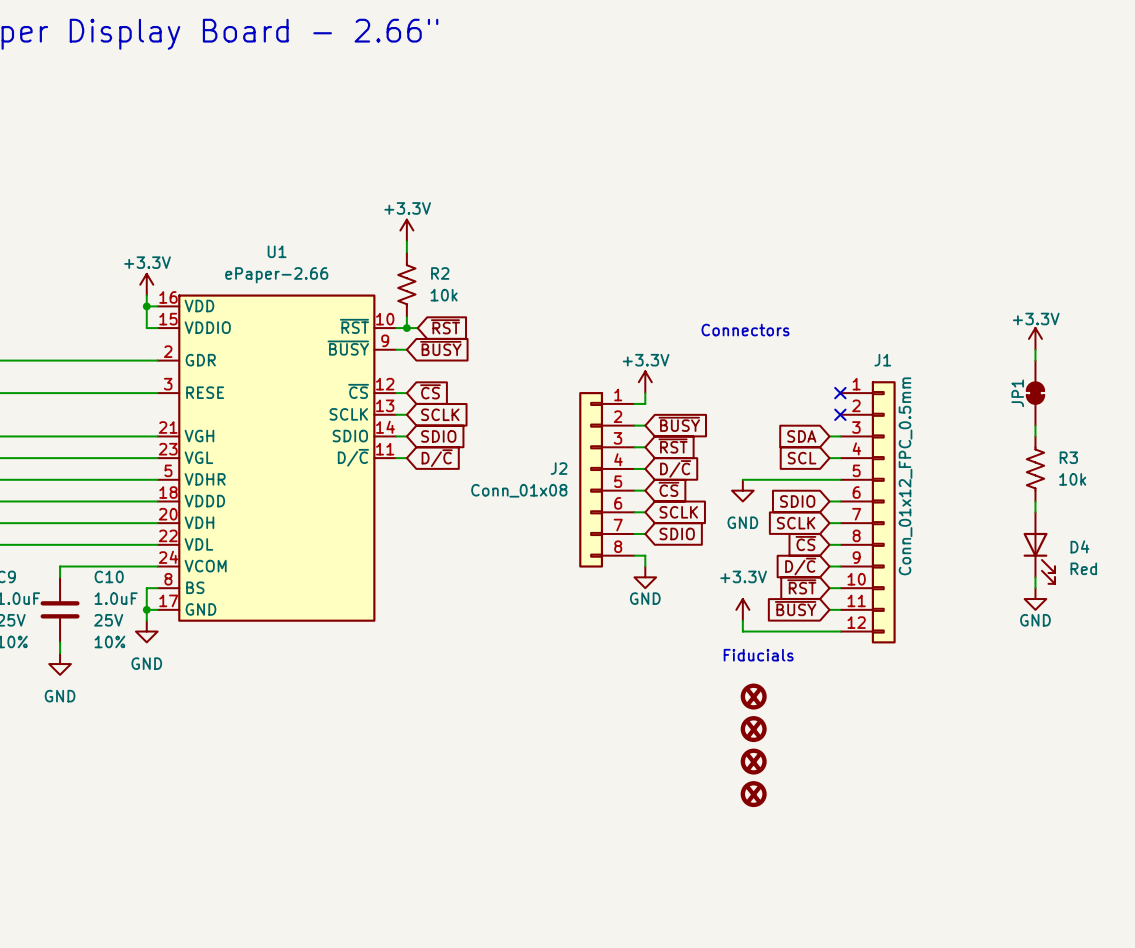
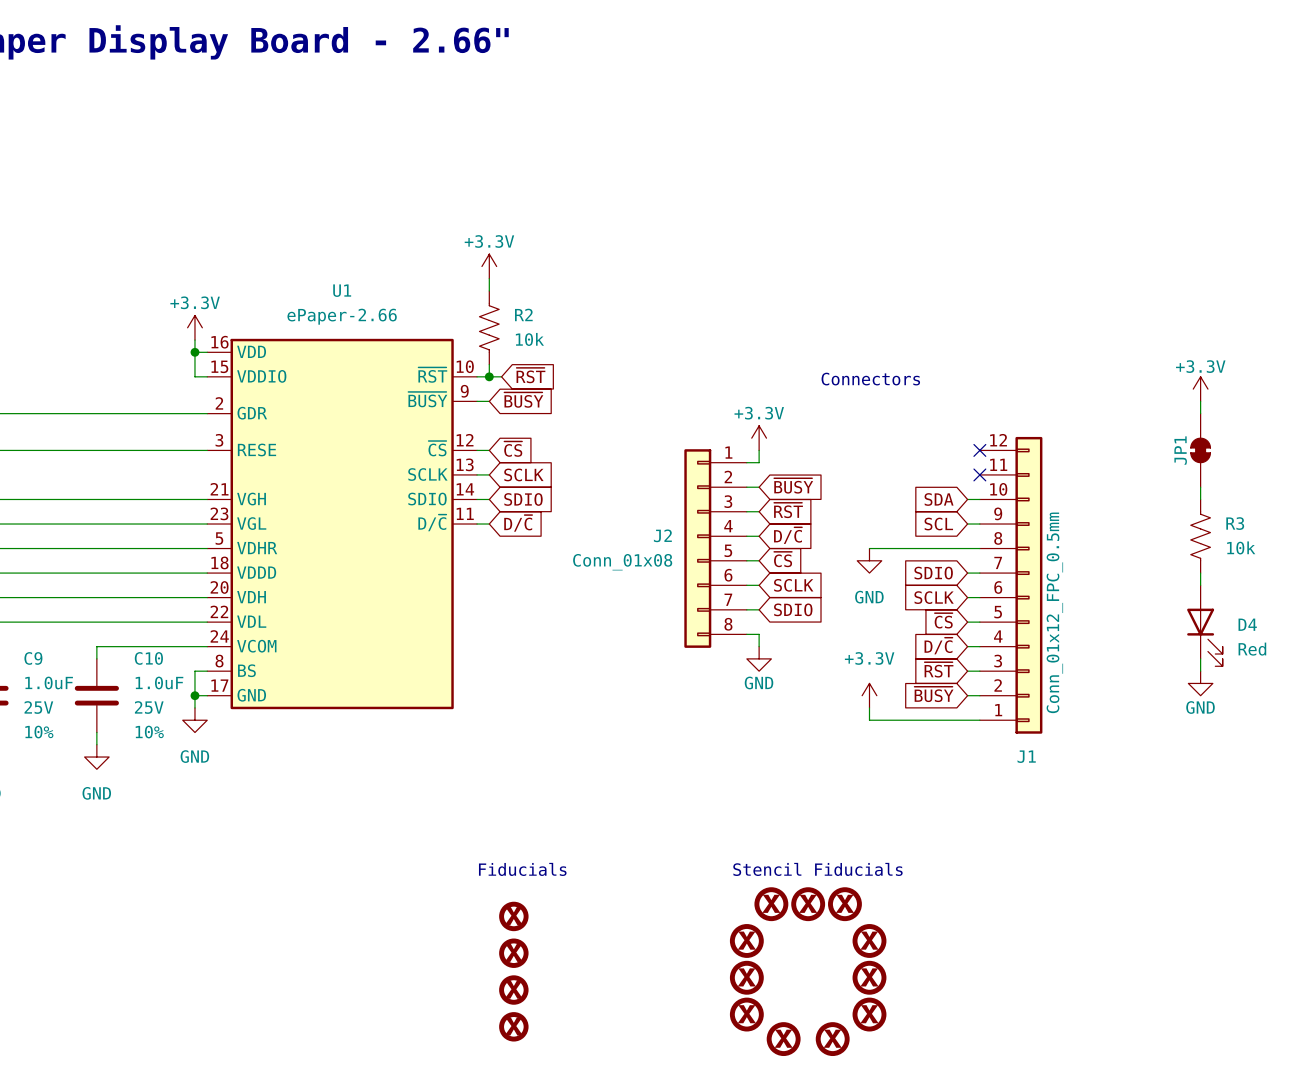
J1 flip: as is (883, 512) -> up-down (1028, 585)
text: Fiducials (758, 655) -> none
part: (753, 696) -> none
part: (753, 729) -> none
part: (753, 761) -> none
text: none -> Fiducials (522, 869)
text: none -> Stencil Fiducials (817, 869)
part: none -> (771, 904)
part: none -> (808, 904)
part: none -> (844, 904)
part: (753, 794) -> none
part: none -> (513, 916)
part: none -> (746, 940)
part: none -> (869, 940)
part: none -> (513, 953)
part: none -> (746, 977)
part: none -> (869, 977)
part: none -> (513, 990)
part: none -> (746, 1014)
part: none -> (869, 1014)
part: none -> (513, 1026)
part: none -> (783, 1039)
part: none -> (832, 1039)

